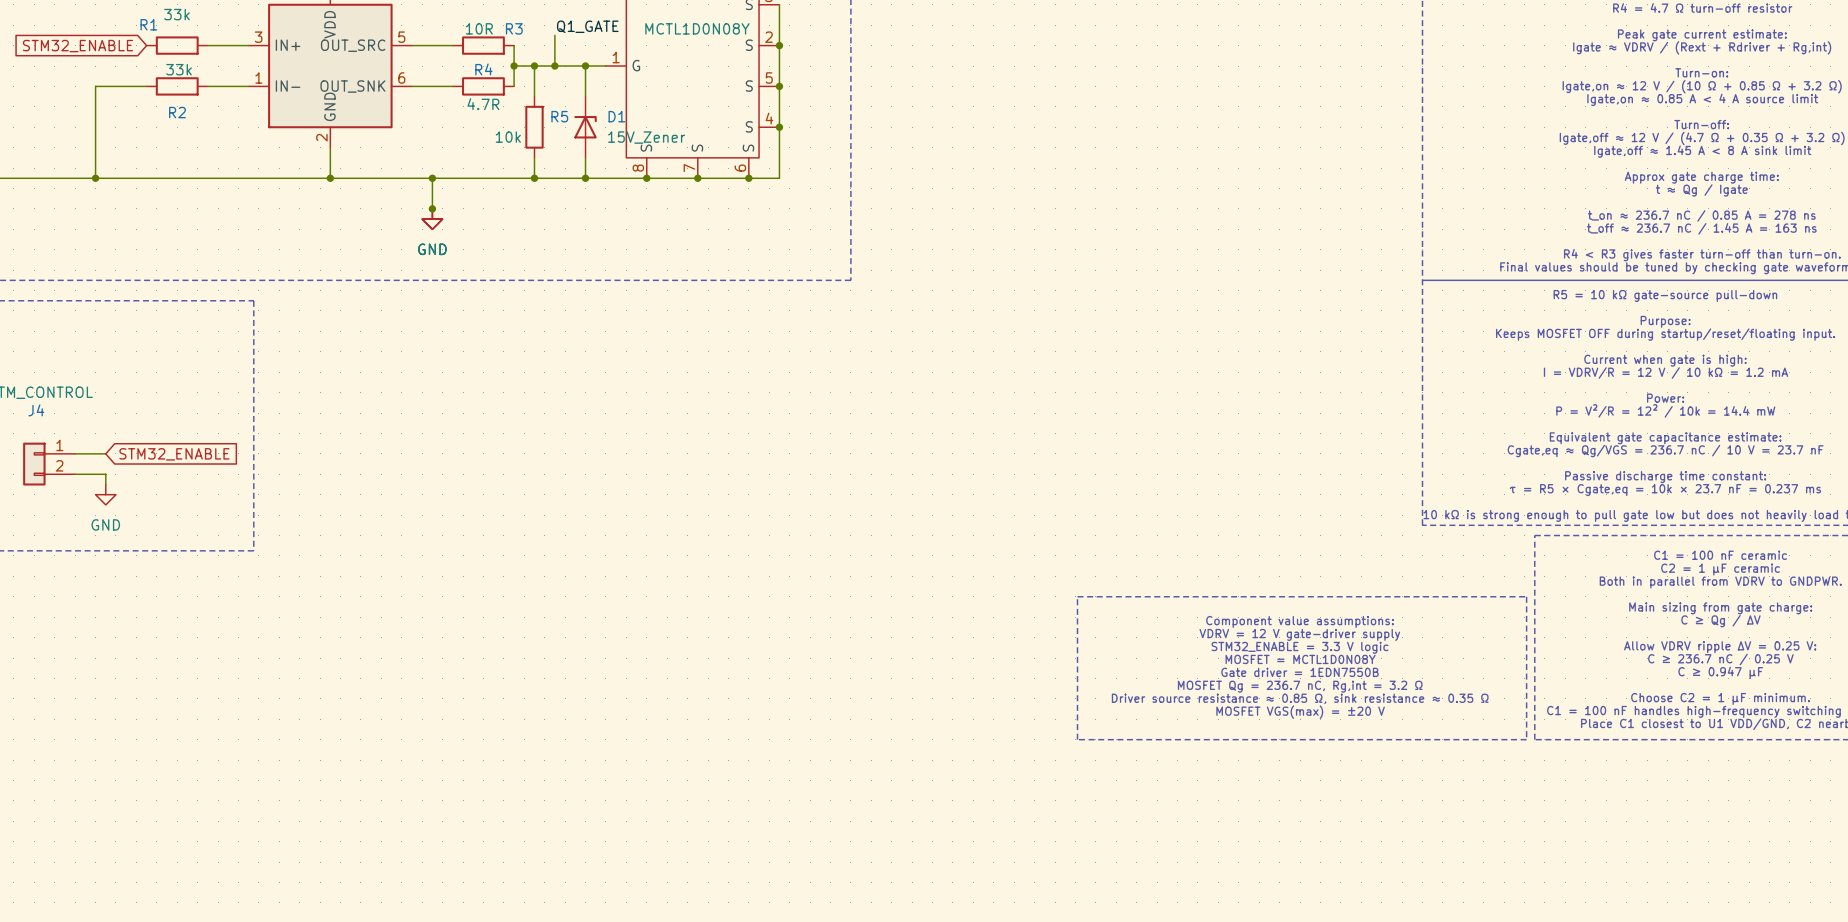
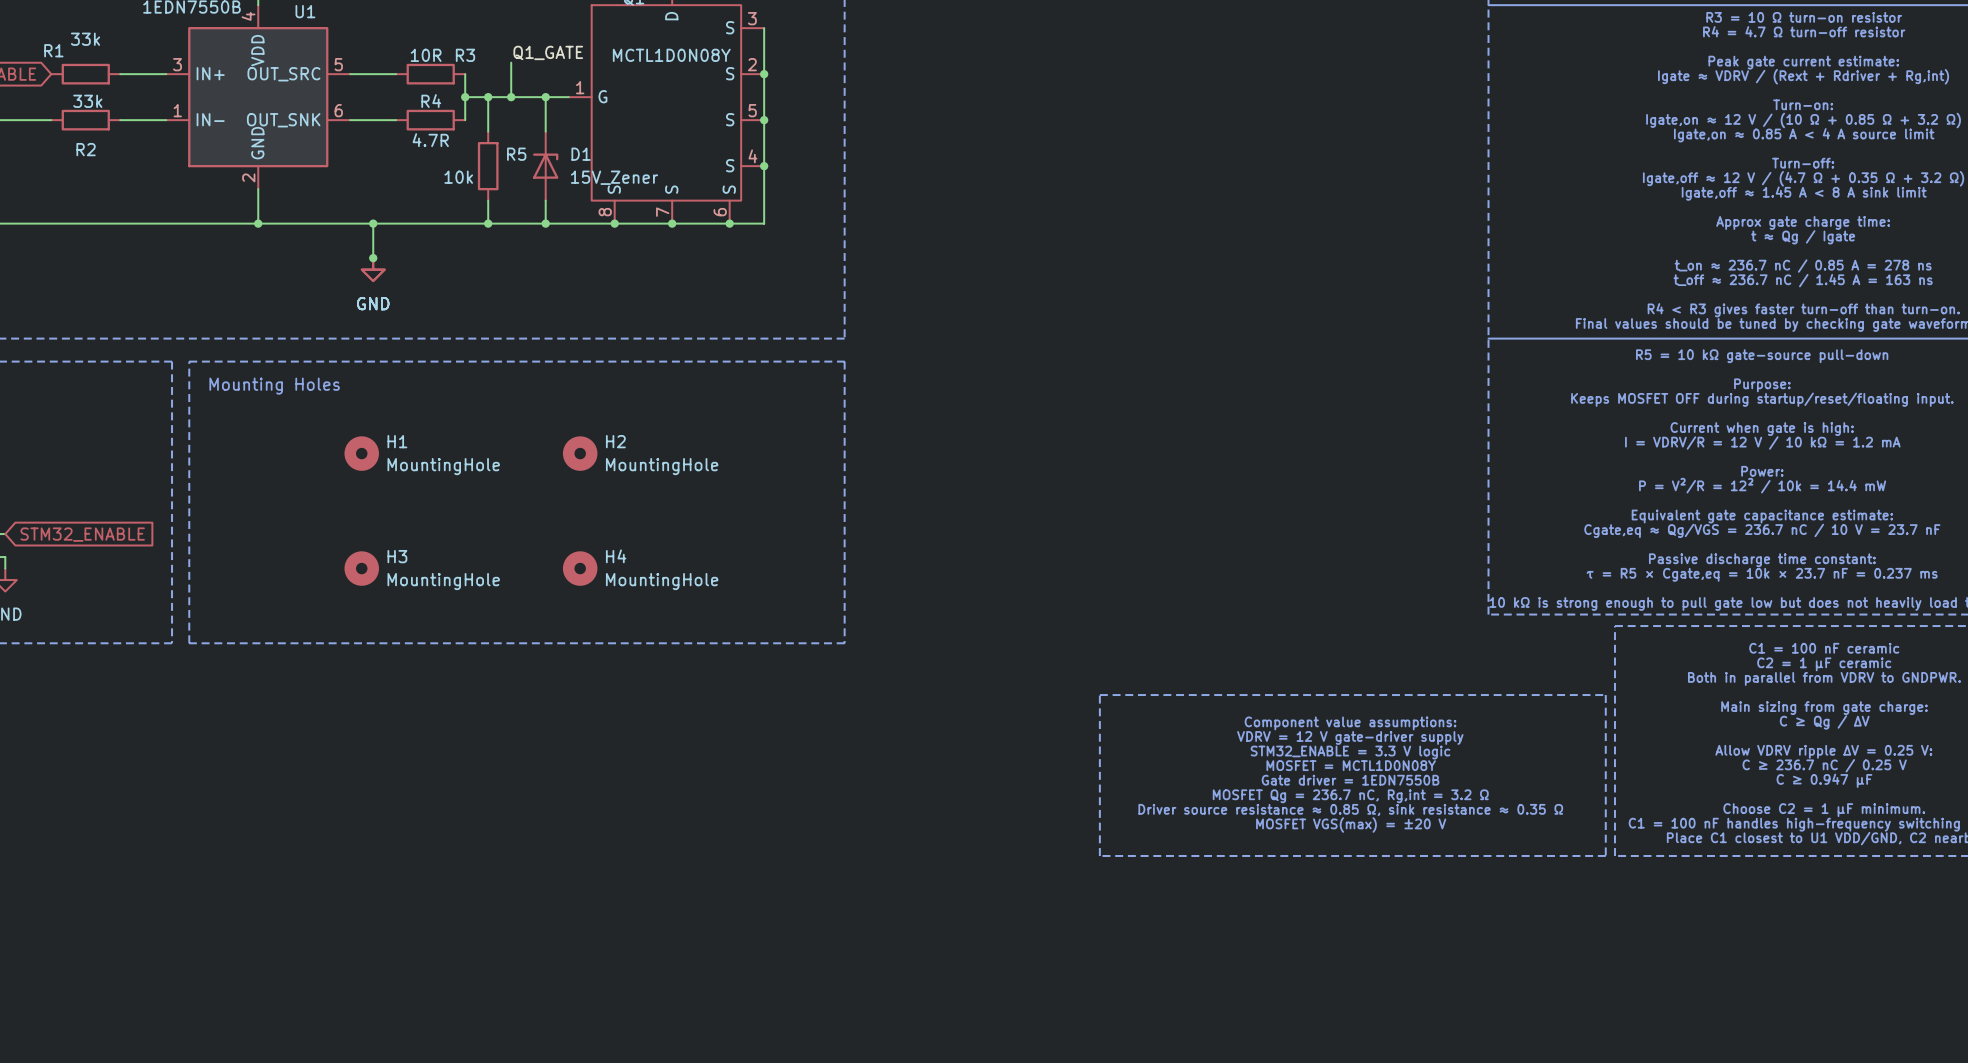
line: none -> (189, 361) (844, 361) (844, 643) (189, 643) (189, 361)
text: none -> Mounting Holes (274, 386)
H1: none -> MountingHole (361, 453)
H2: none -> MountingHole (580, 453)
H3: none -> MountingHole (361, 568)
H4: none -> MountingHole (580, 568)

